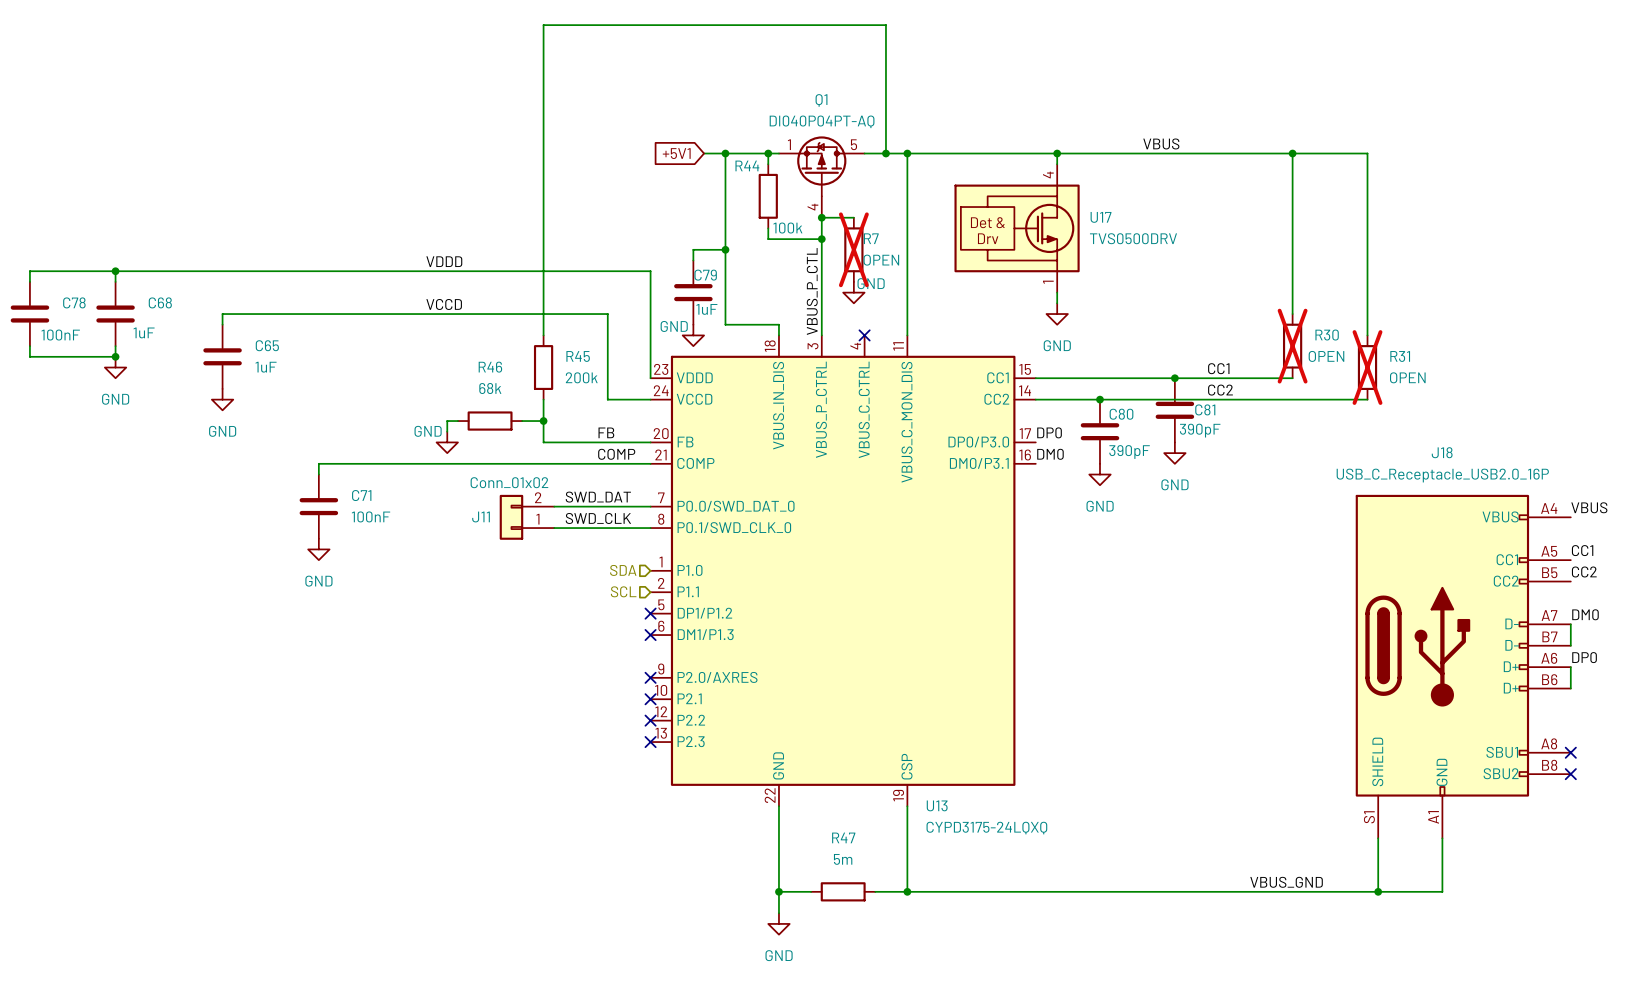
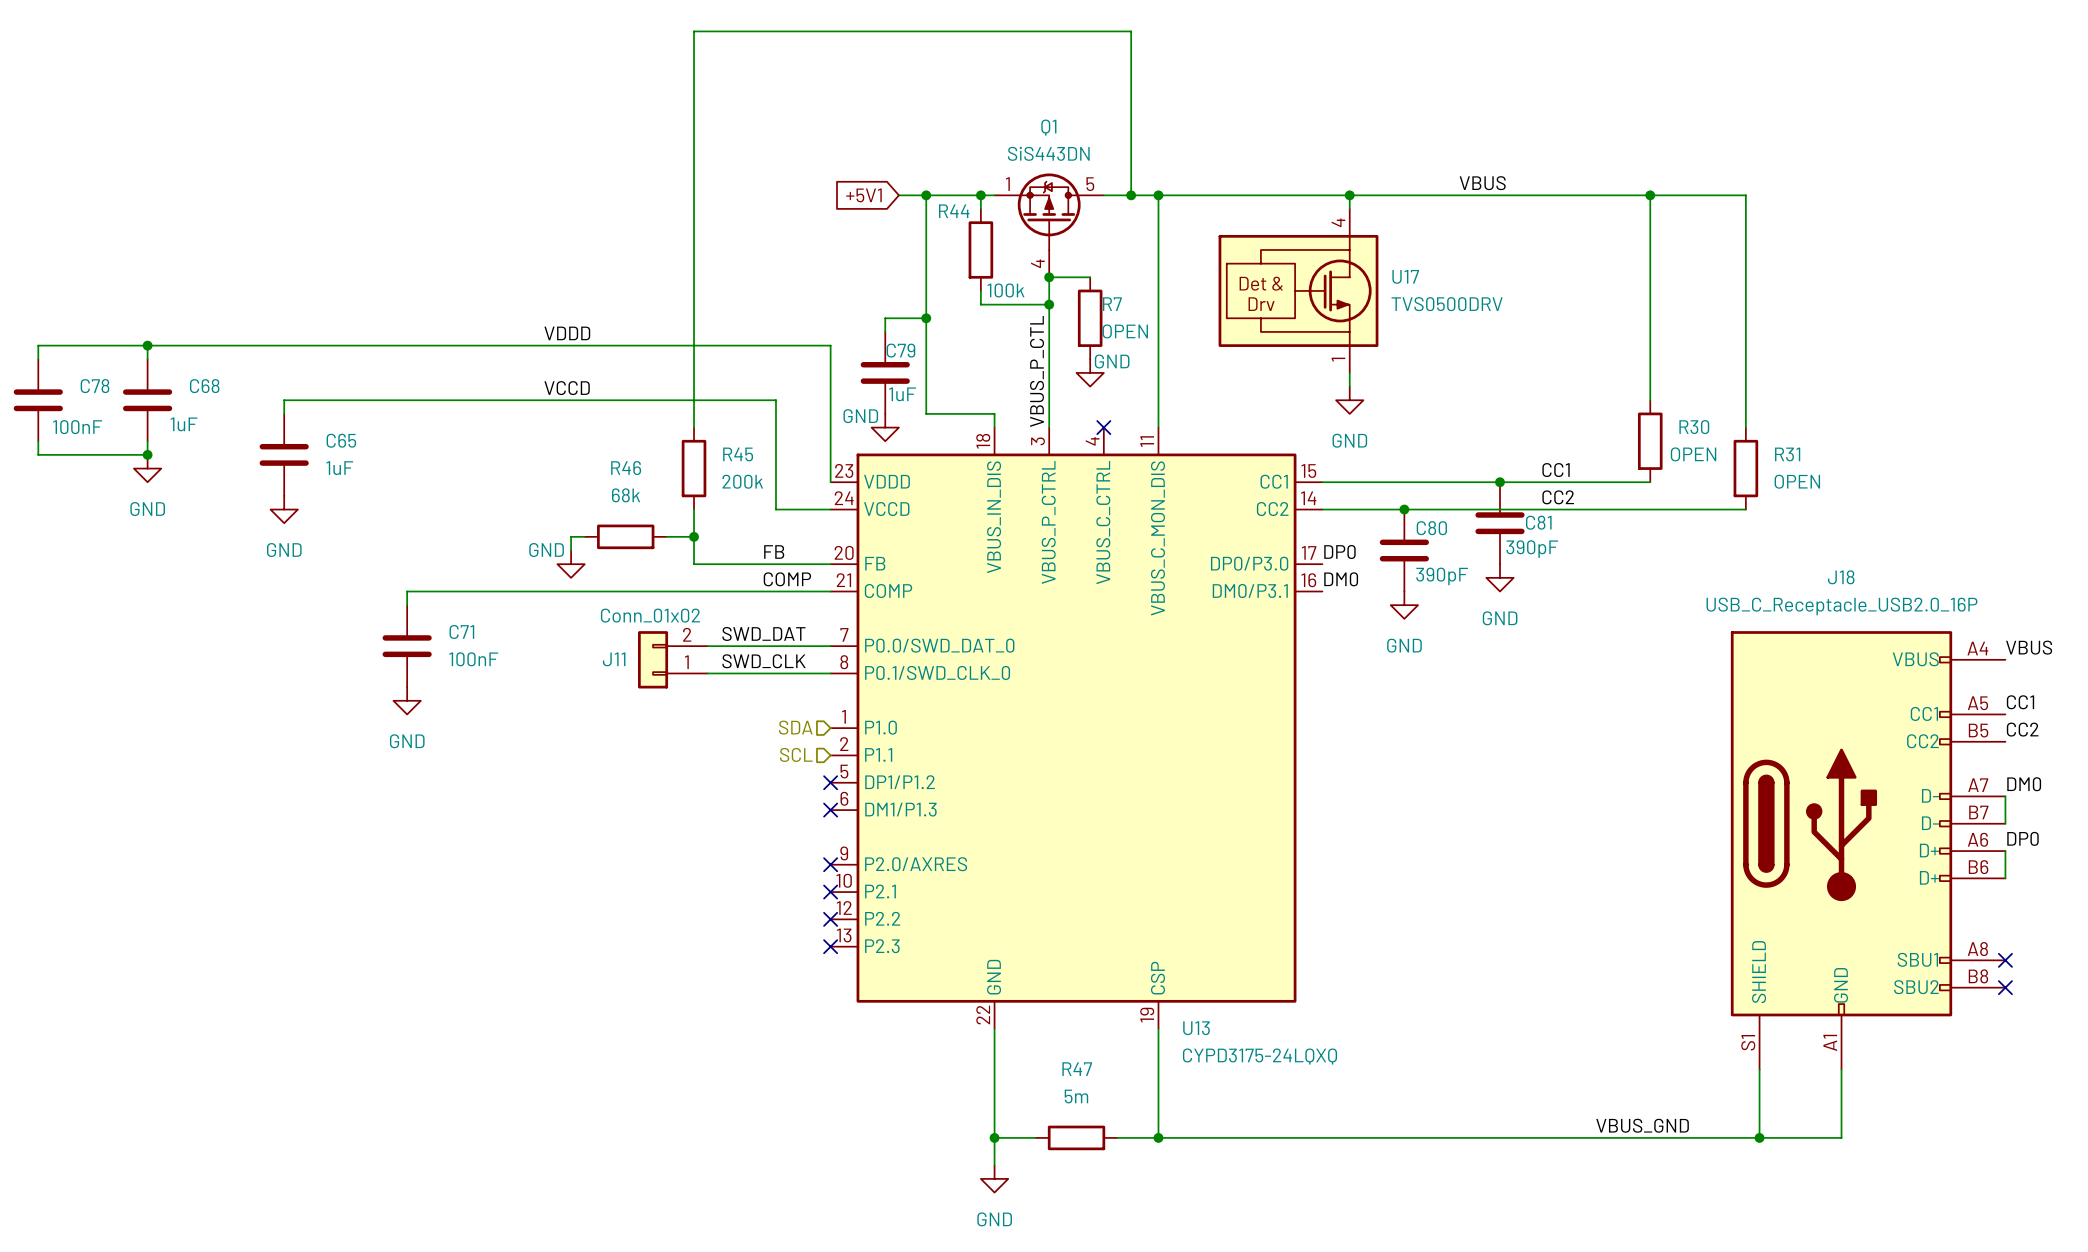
Q1 value: DI040P04PT-AQ (822, 121) -> SiS443DN (1048, 153)
R7 do-not-place cross: (853, 249) -> none
R30 do-not-place cross: (1292, 346) -> none
R31 do-not-place cross: (1367, 367) -> none

